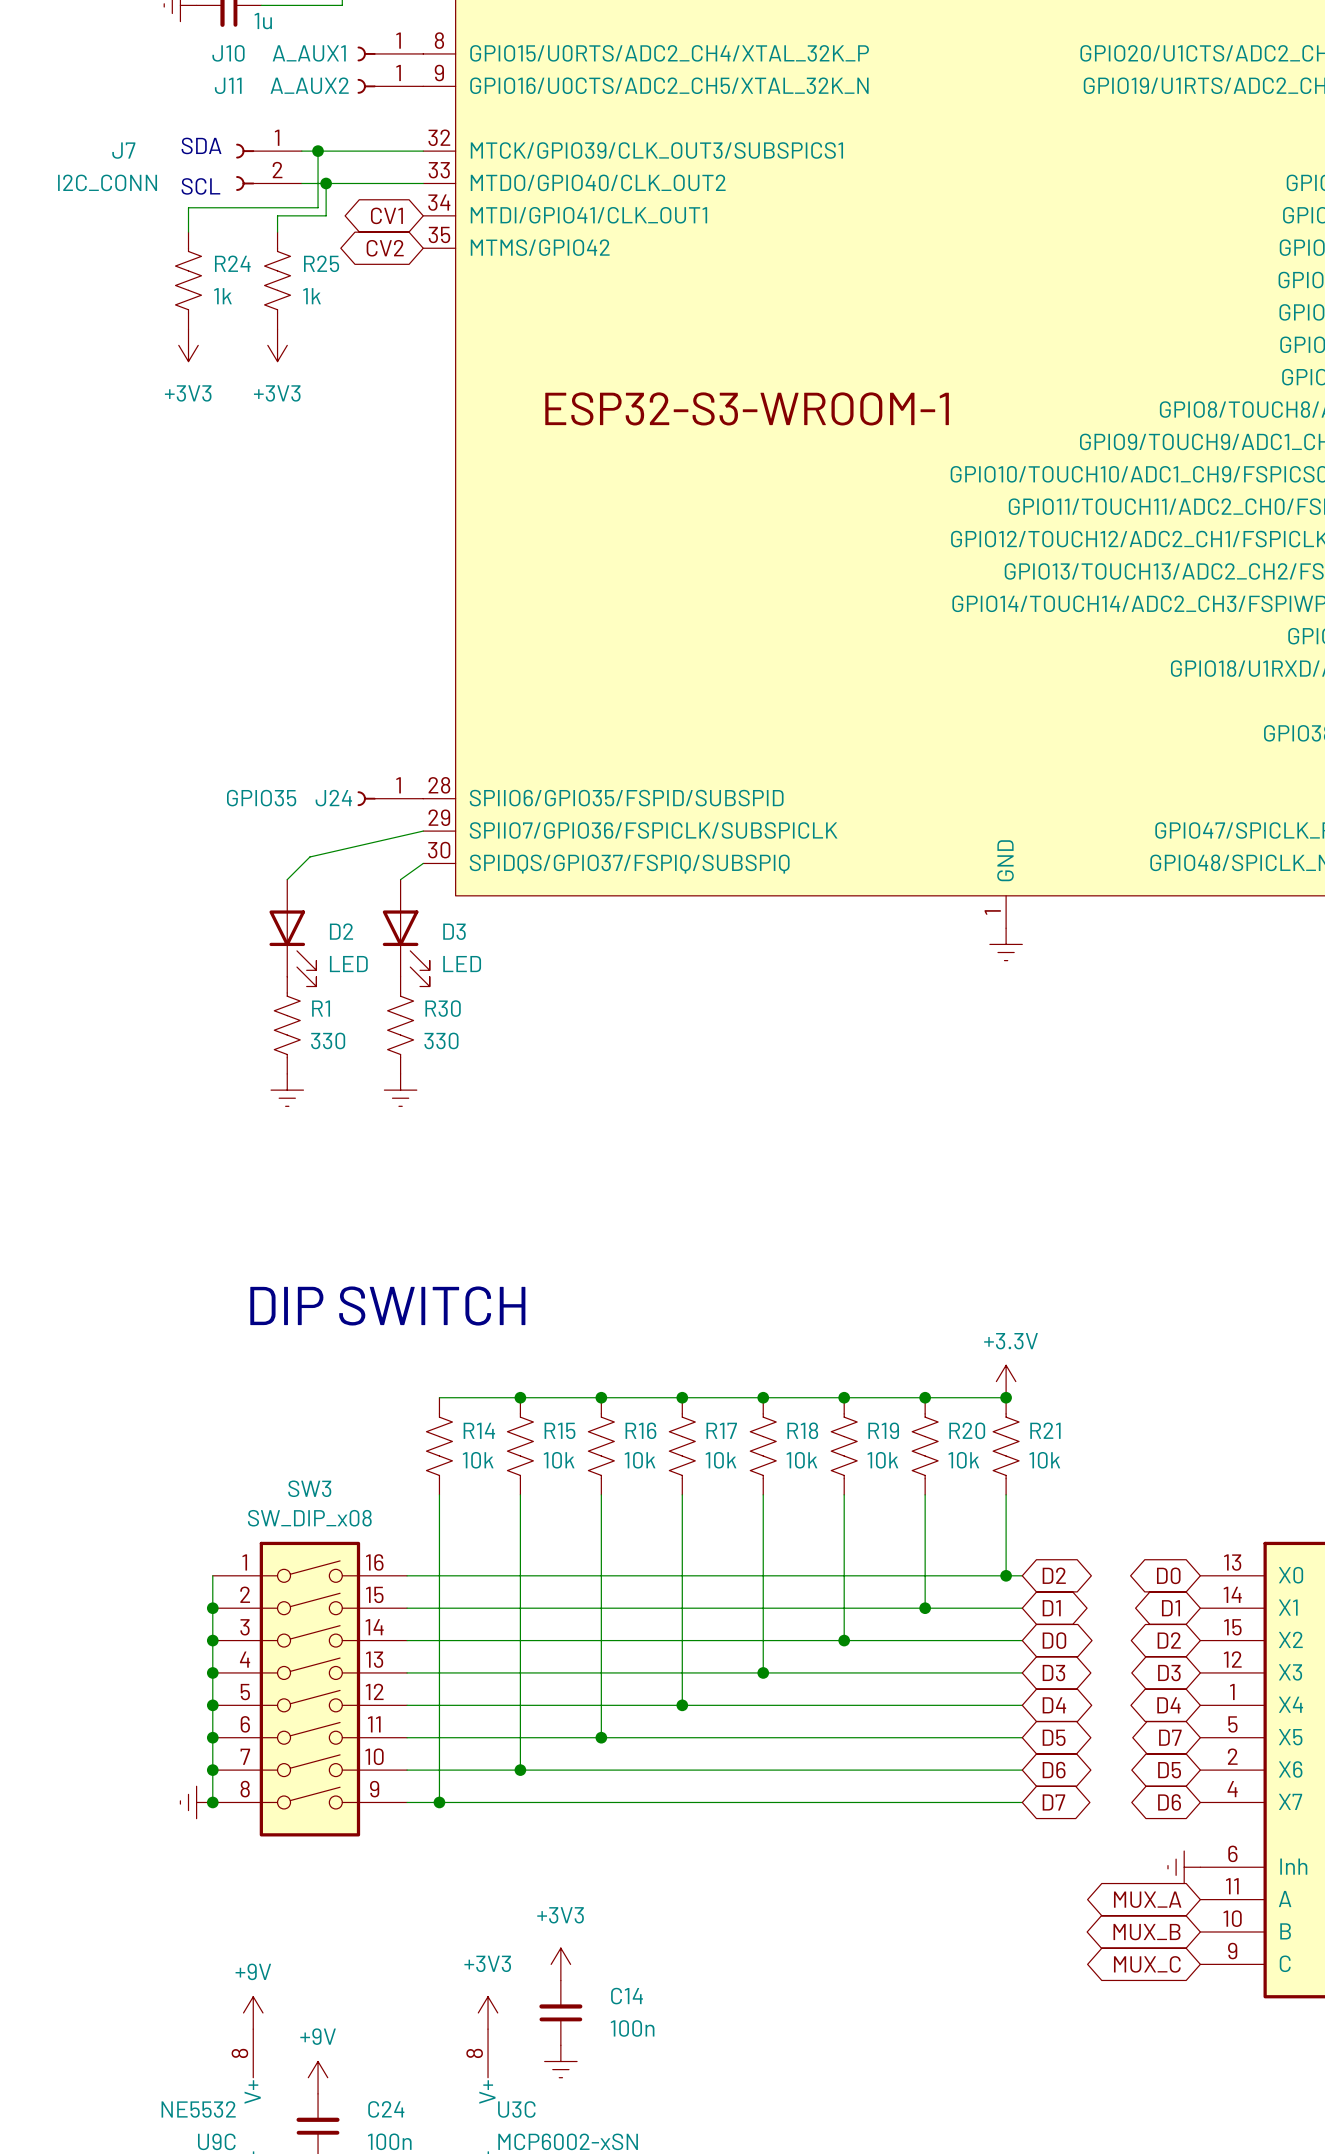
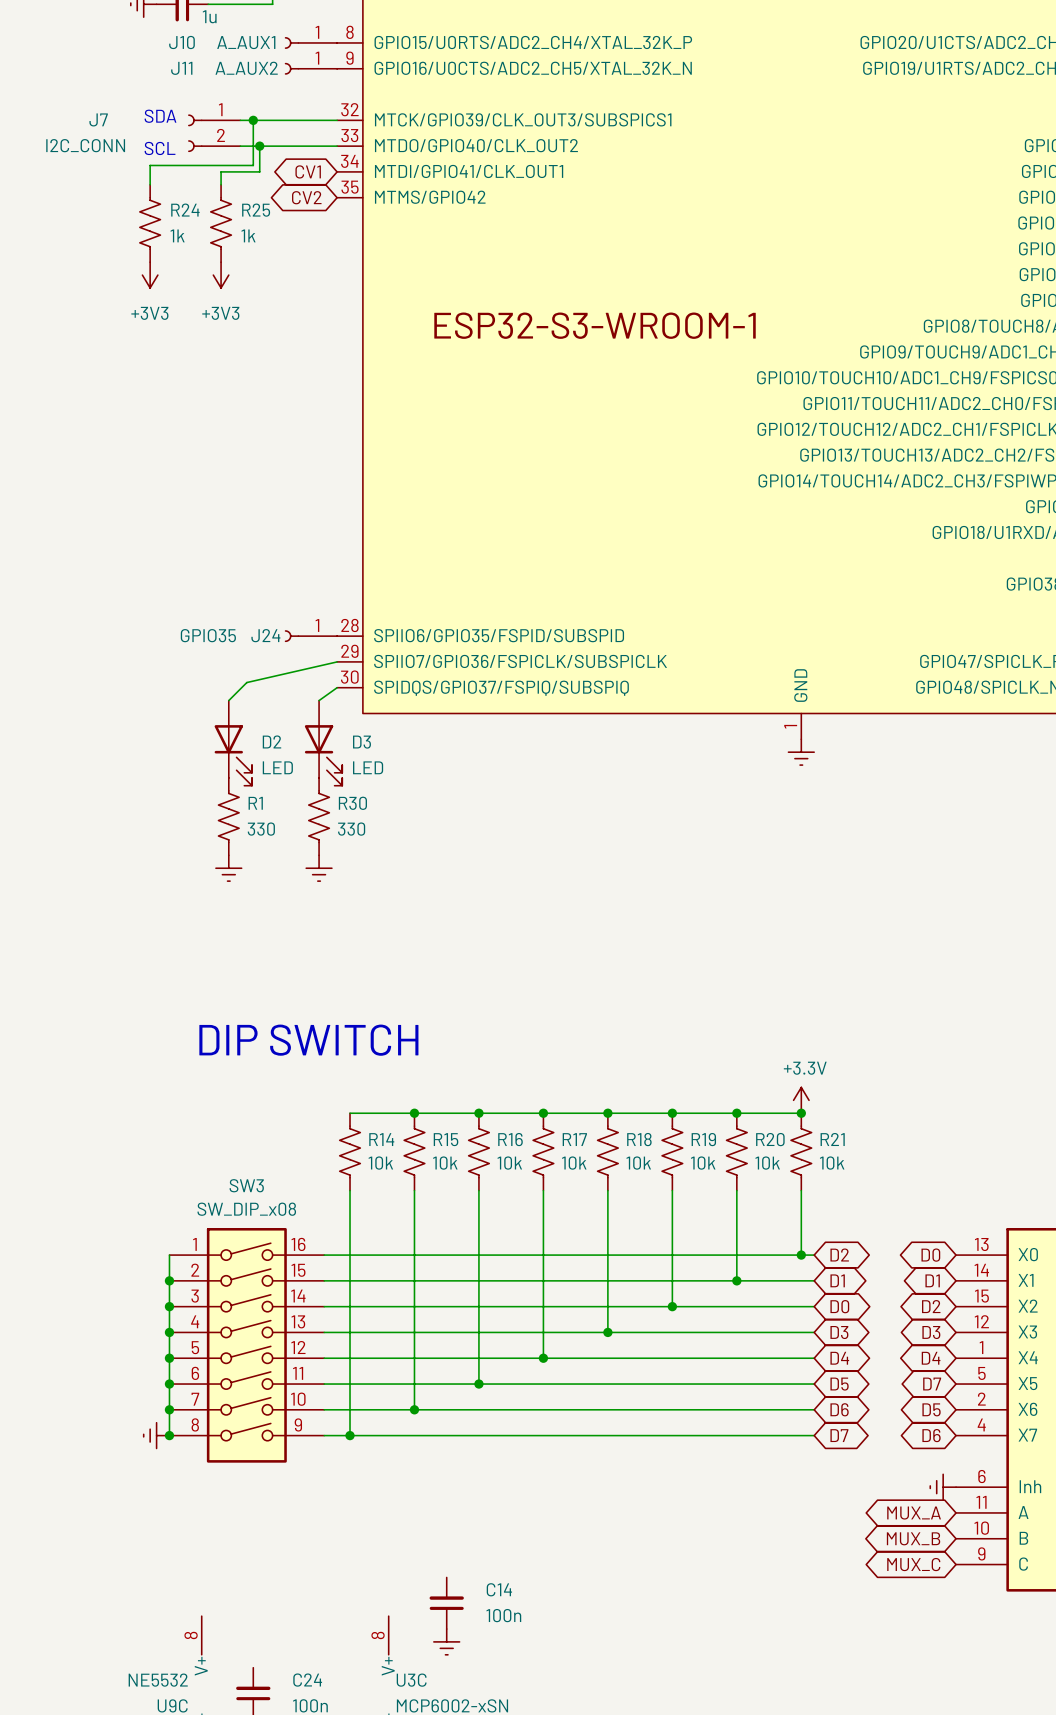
power symbol: +3V3 (560, 1964) -> none
power symbol: +9V (253, 2012) -> none
power symbol: +3V3 (488, 2012) -> none
power symbol: +9V (318, 2077) -> none

